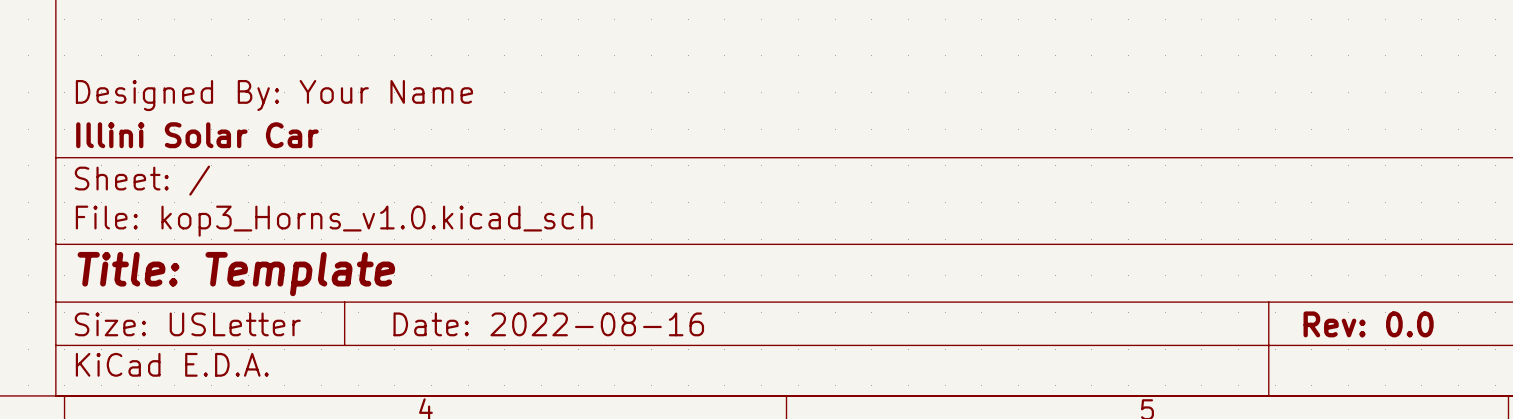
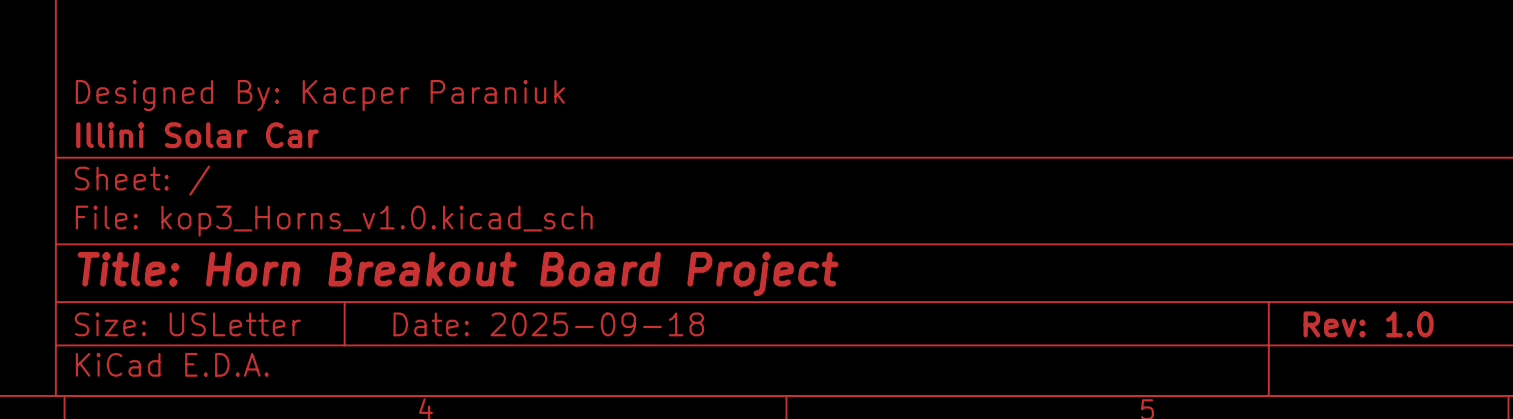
title block: Designed By: Your Name (274, 95) -> Designed By: Kacper Paraniuk (320, 95)
title block: Title: Template (236, 274) -> Title: Horn Breakout Board Project (458, 274)
title block: Date: 2022-08-16 (548, 324) -> Date: 2025-09-18 (548, 324)
title block: Rev: 0.0 (1368, 324) -> Rev: 1.0 (1368, 324)

